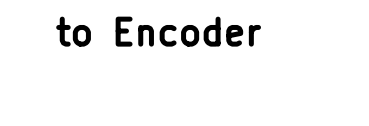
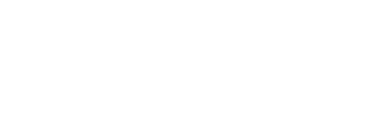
text: to Encoder (158, 31) -> none

